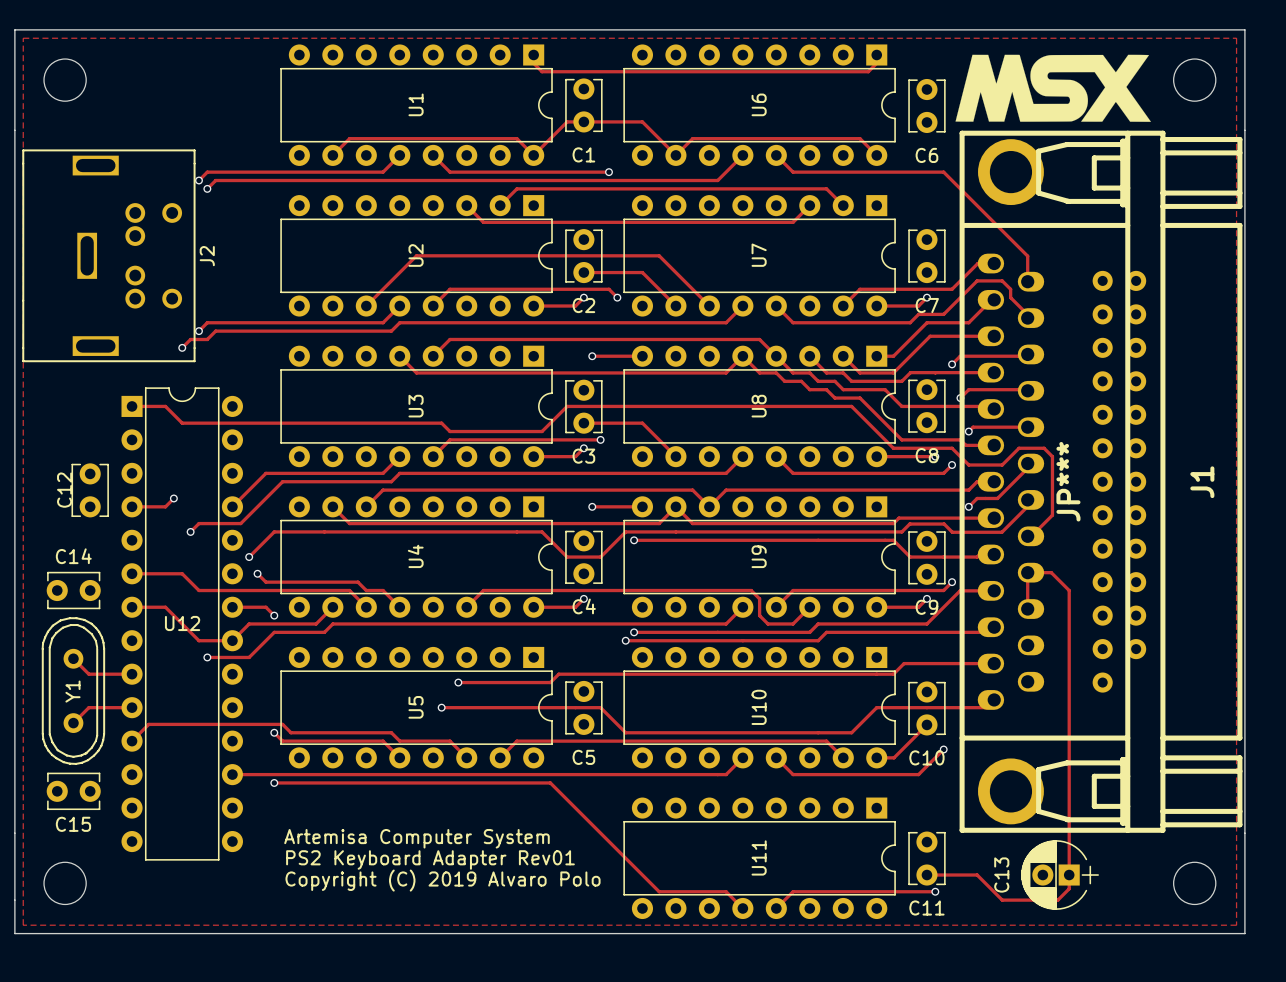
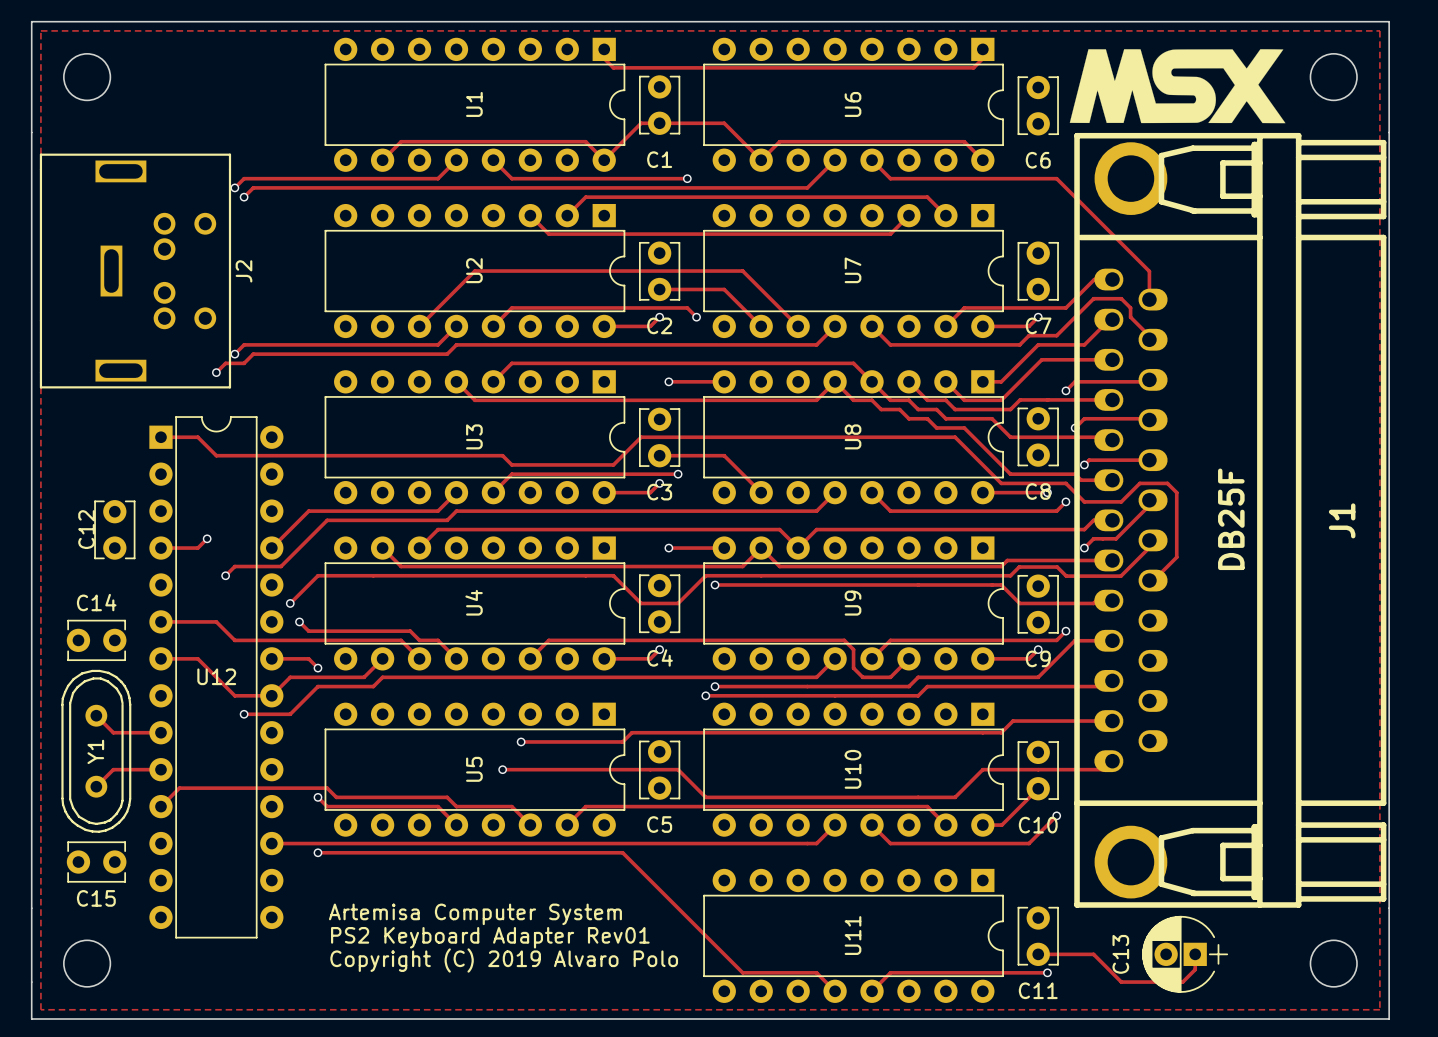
J1 footprint: [959, 130, 1243, 833] -> [1074, 132, 1387, 908]
J1 value: JP*** (1068, 481) -> DB25F (1231, 519)
track: (1027, 609) (1027, 572) (1051, 572) (1069, 590) (1069, 875) -> none

